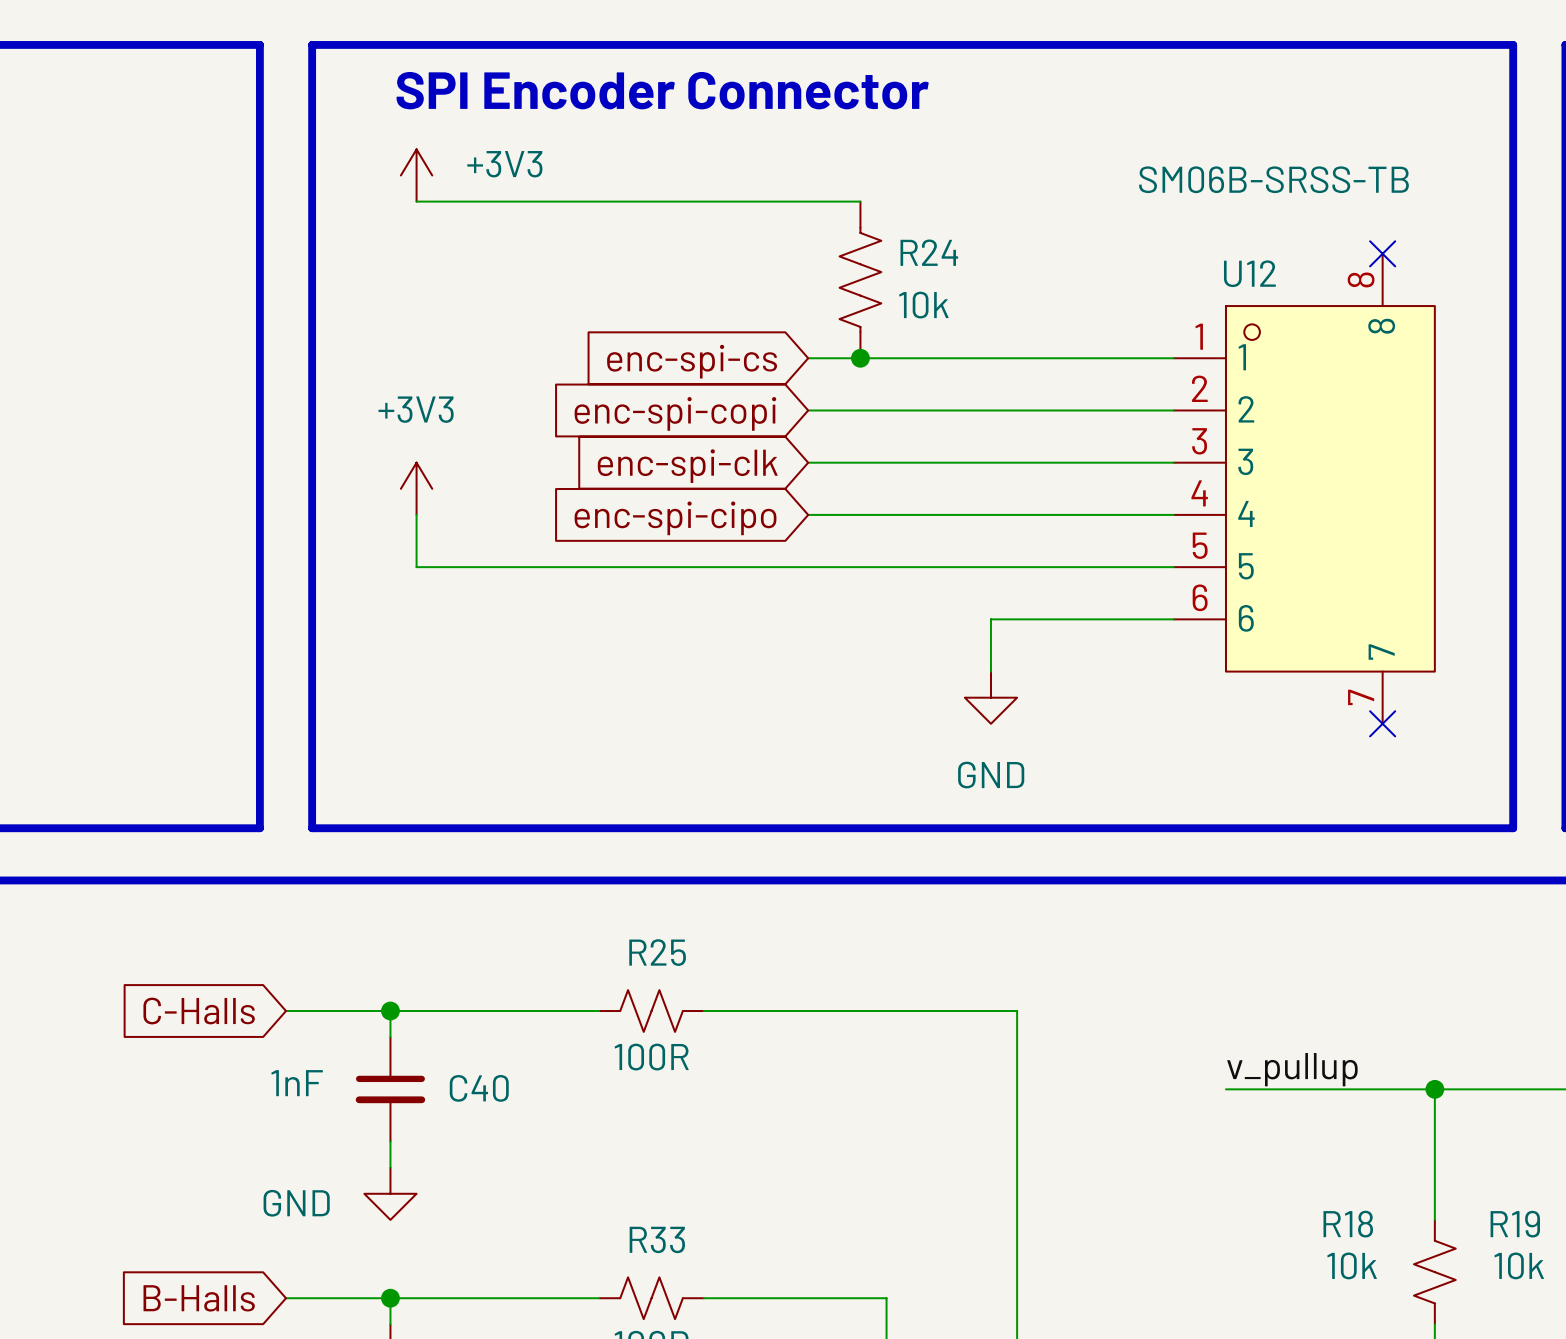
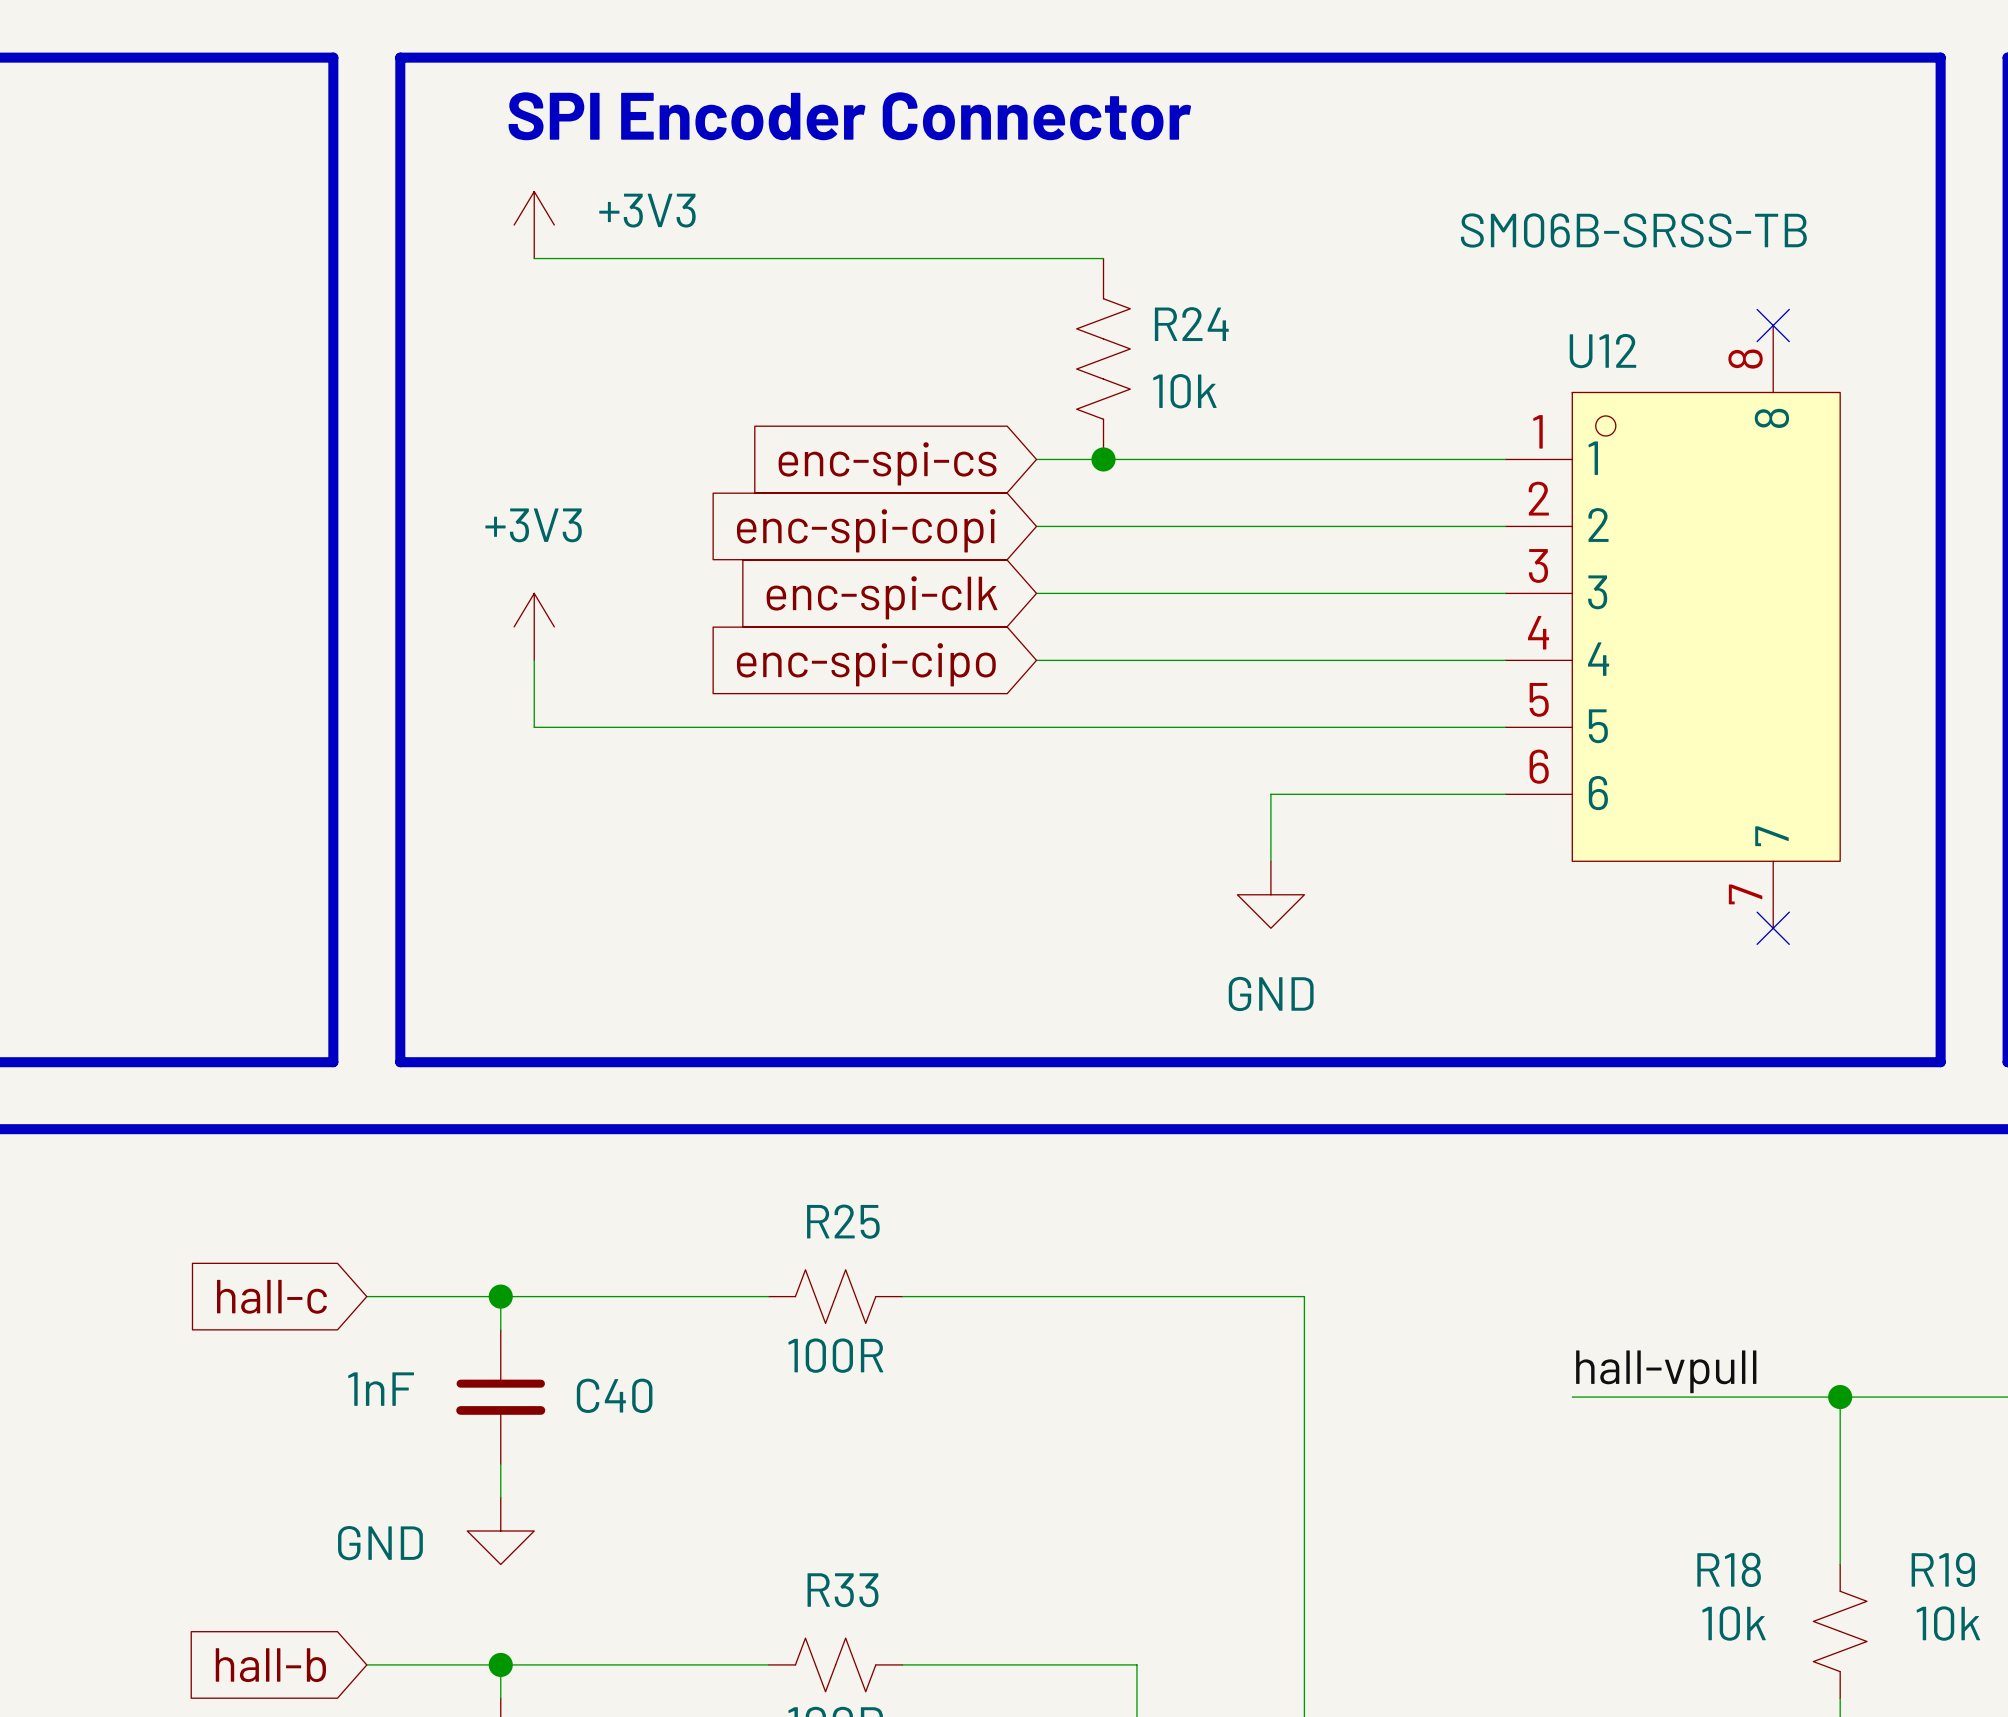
global label: C-Halls (199, 1011) -> hall-c (271, 1296)
label: v_pullup (1292, 1069) -> hall-vpull (1666, 1371)
global label: B-Halls (199, 1298) -> hall-b (270, 1665)

